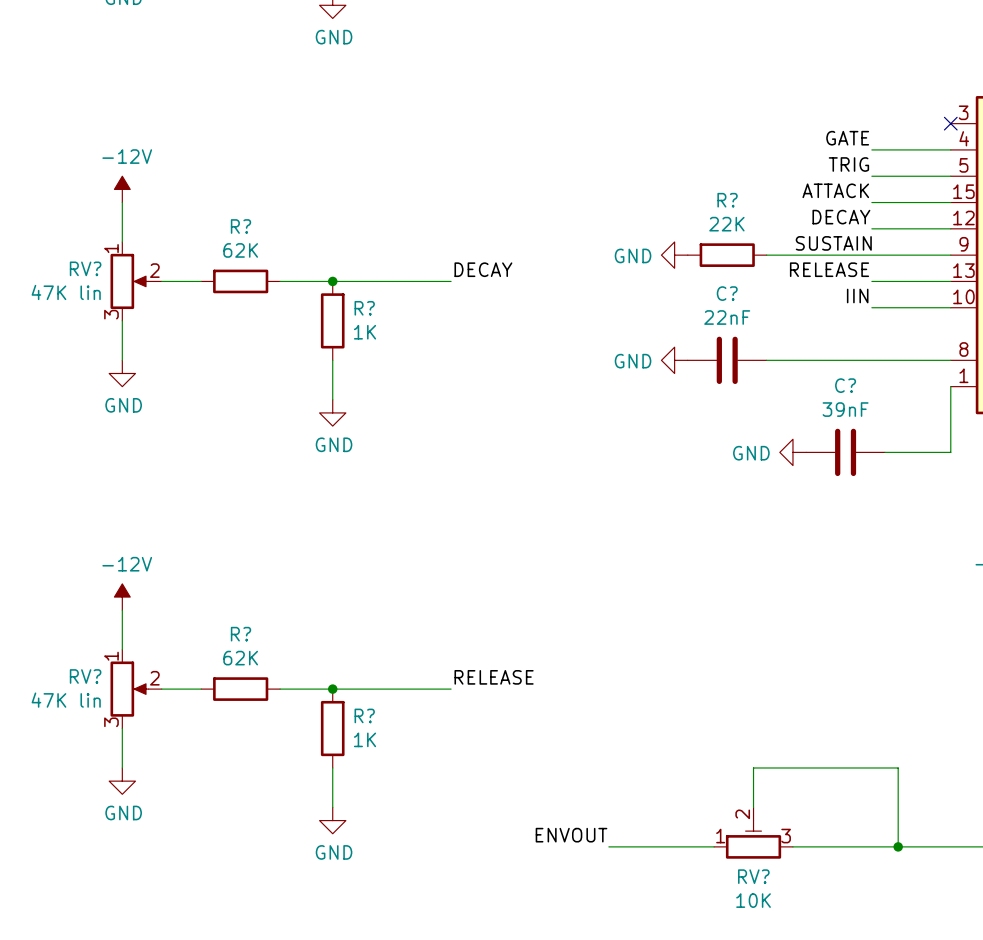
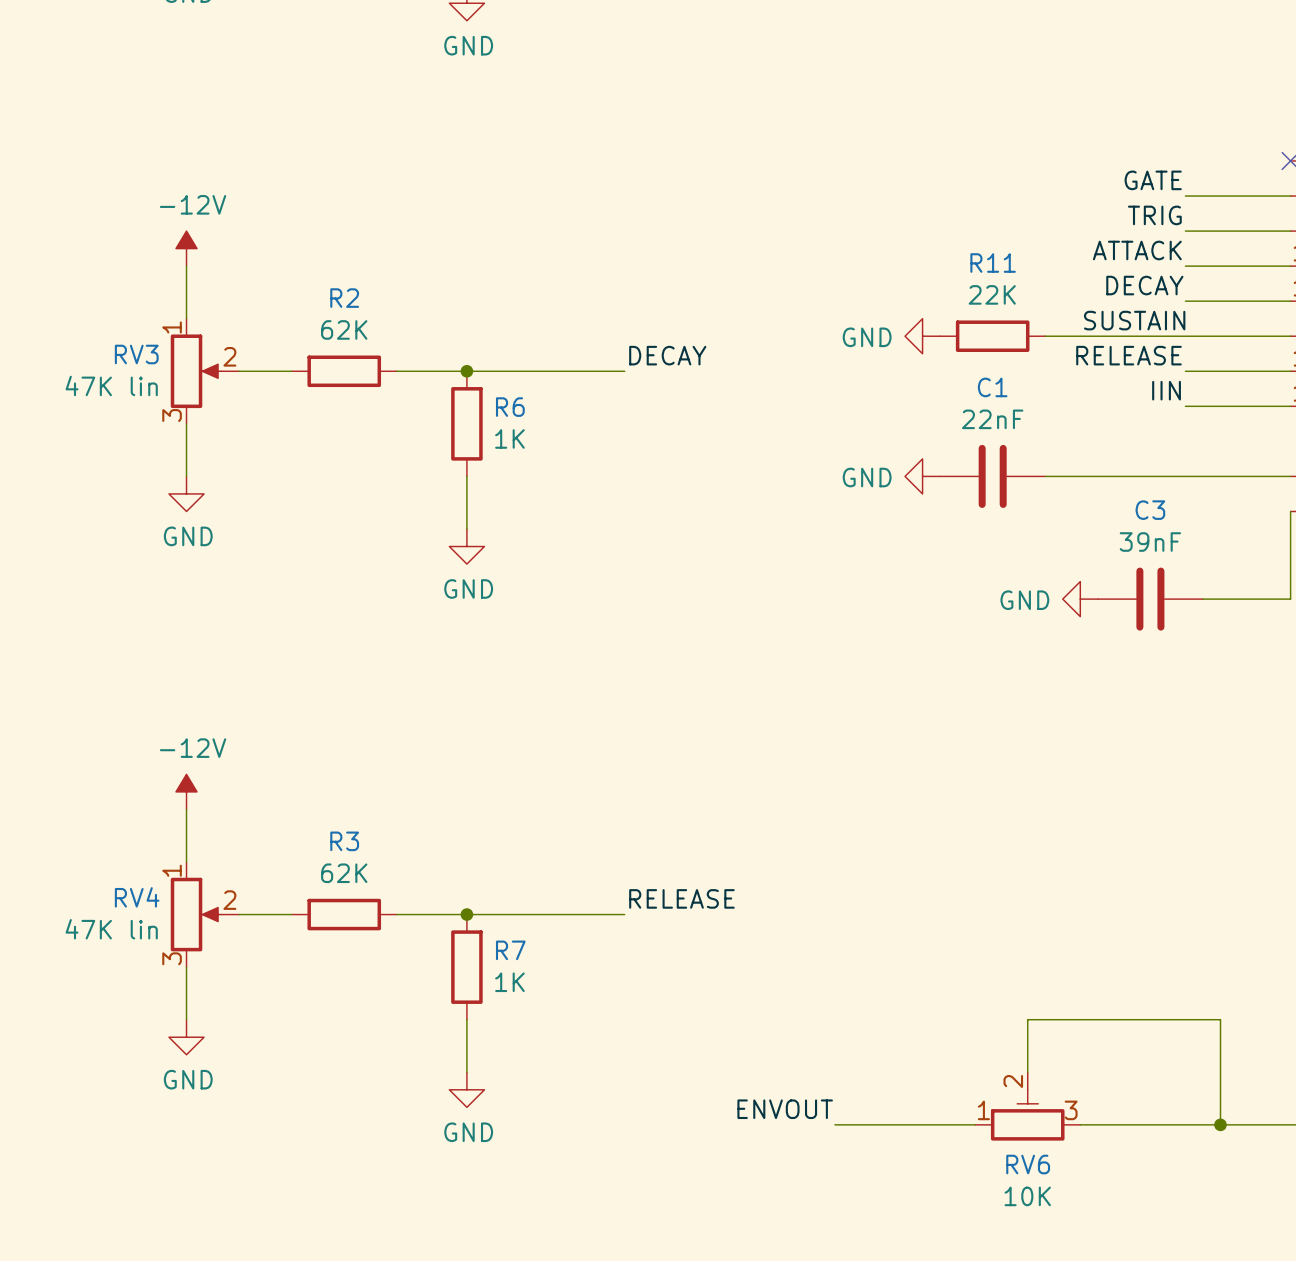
R? name: R? (727, 200) -> R11 (993, 263)
R? name: R? (240, 226) -> R2 (344, 298)
RV? name: RV? (85, 268) -> RV3 (136, 354)
C? name: C? (727, 293) -> C1 (992, 387)
R? name: R? (364, 308) -> R6 (510, 407)
C? name: C? (845, 385) -> C3 (1150, 510)
R? name: R? (240, 634) -> R3 (344, 841)
RV? name: RV? (85, 676) -> RV4 (137, 897)
R? name: R? (364, 715) -> R7 (510, 950)
RV? name: RV? (753, 876) -> RV6 (1028, 1164)

